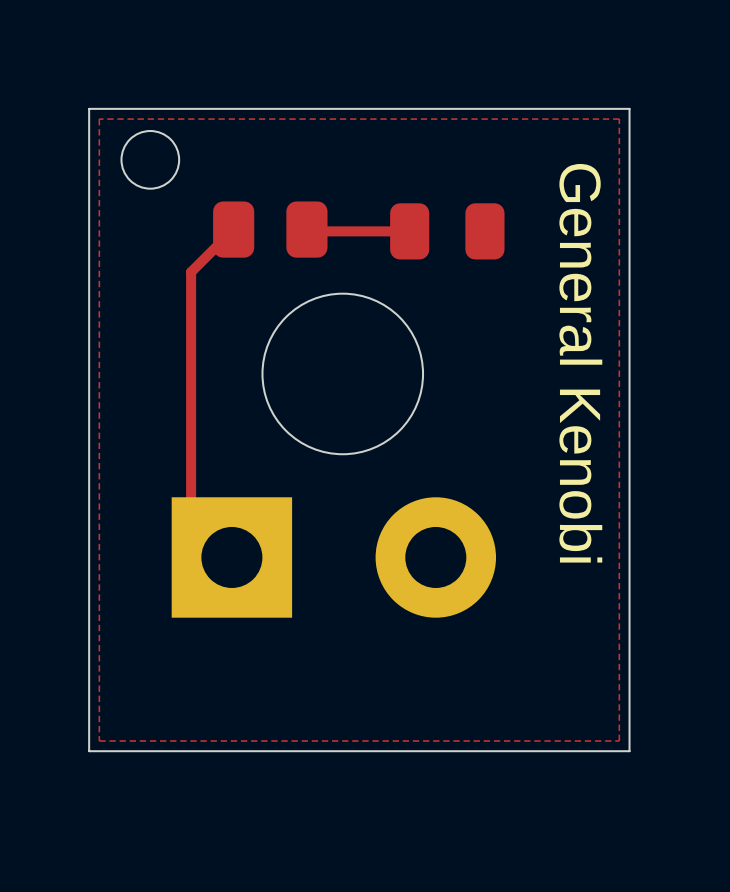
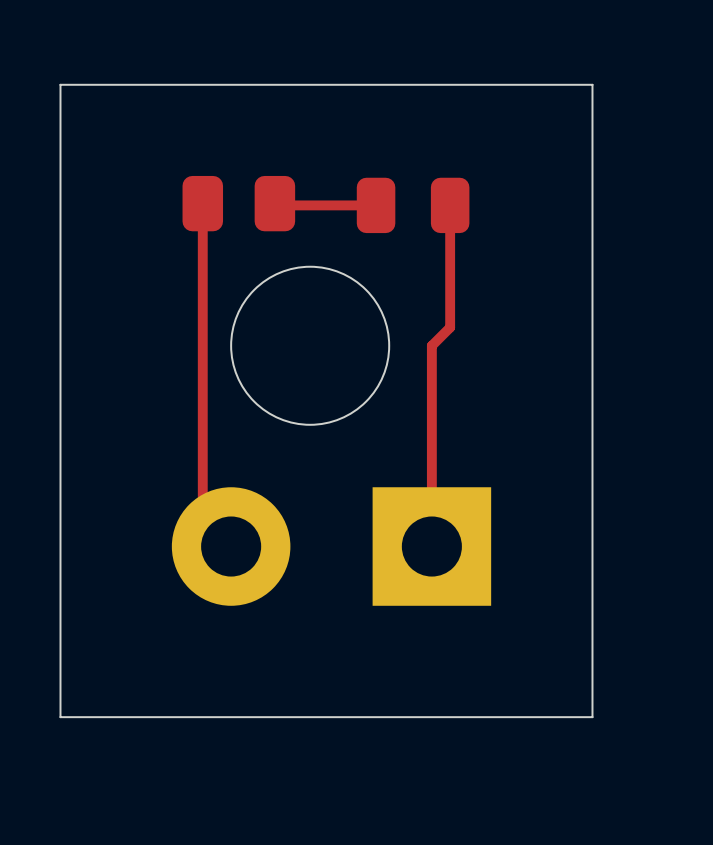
top zone outline: (619, 119) (619, 741) (99, 741) (99, 119) (619, 119) -> none
round board edge: [120, 130, 181, 190] -> none
top track: (233, 229) (191, 272) (191, 557) -> (202, 203) (202, 518) (231, 546)
top track: none -> (450, 205) (450, 327) (431, 345) (431, 546)
text: General Kenobi (580, 363) -> none
part rotation: 0° (333, 557) -> 180° (331, 546)

